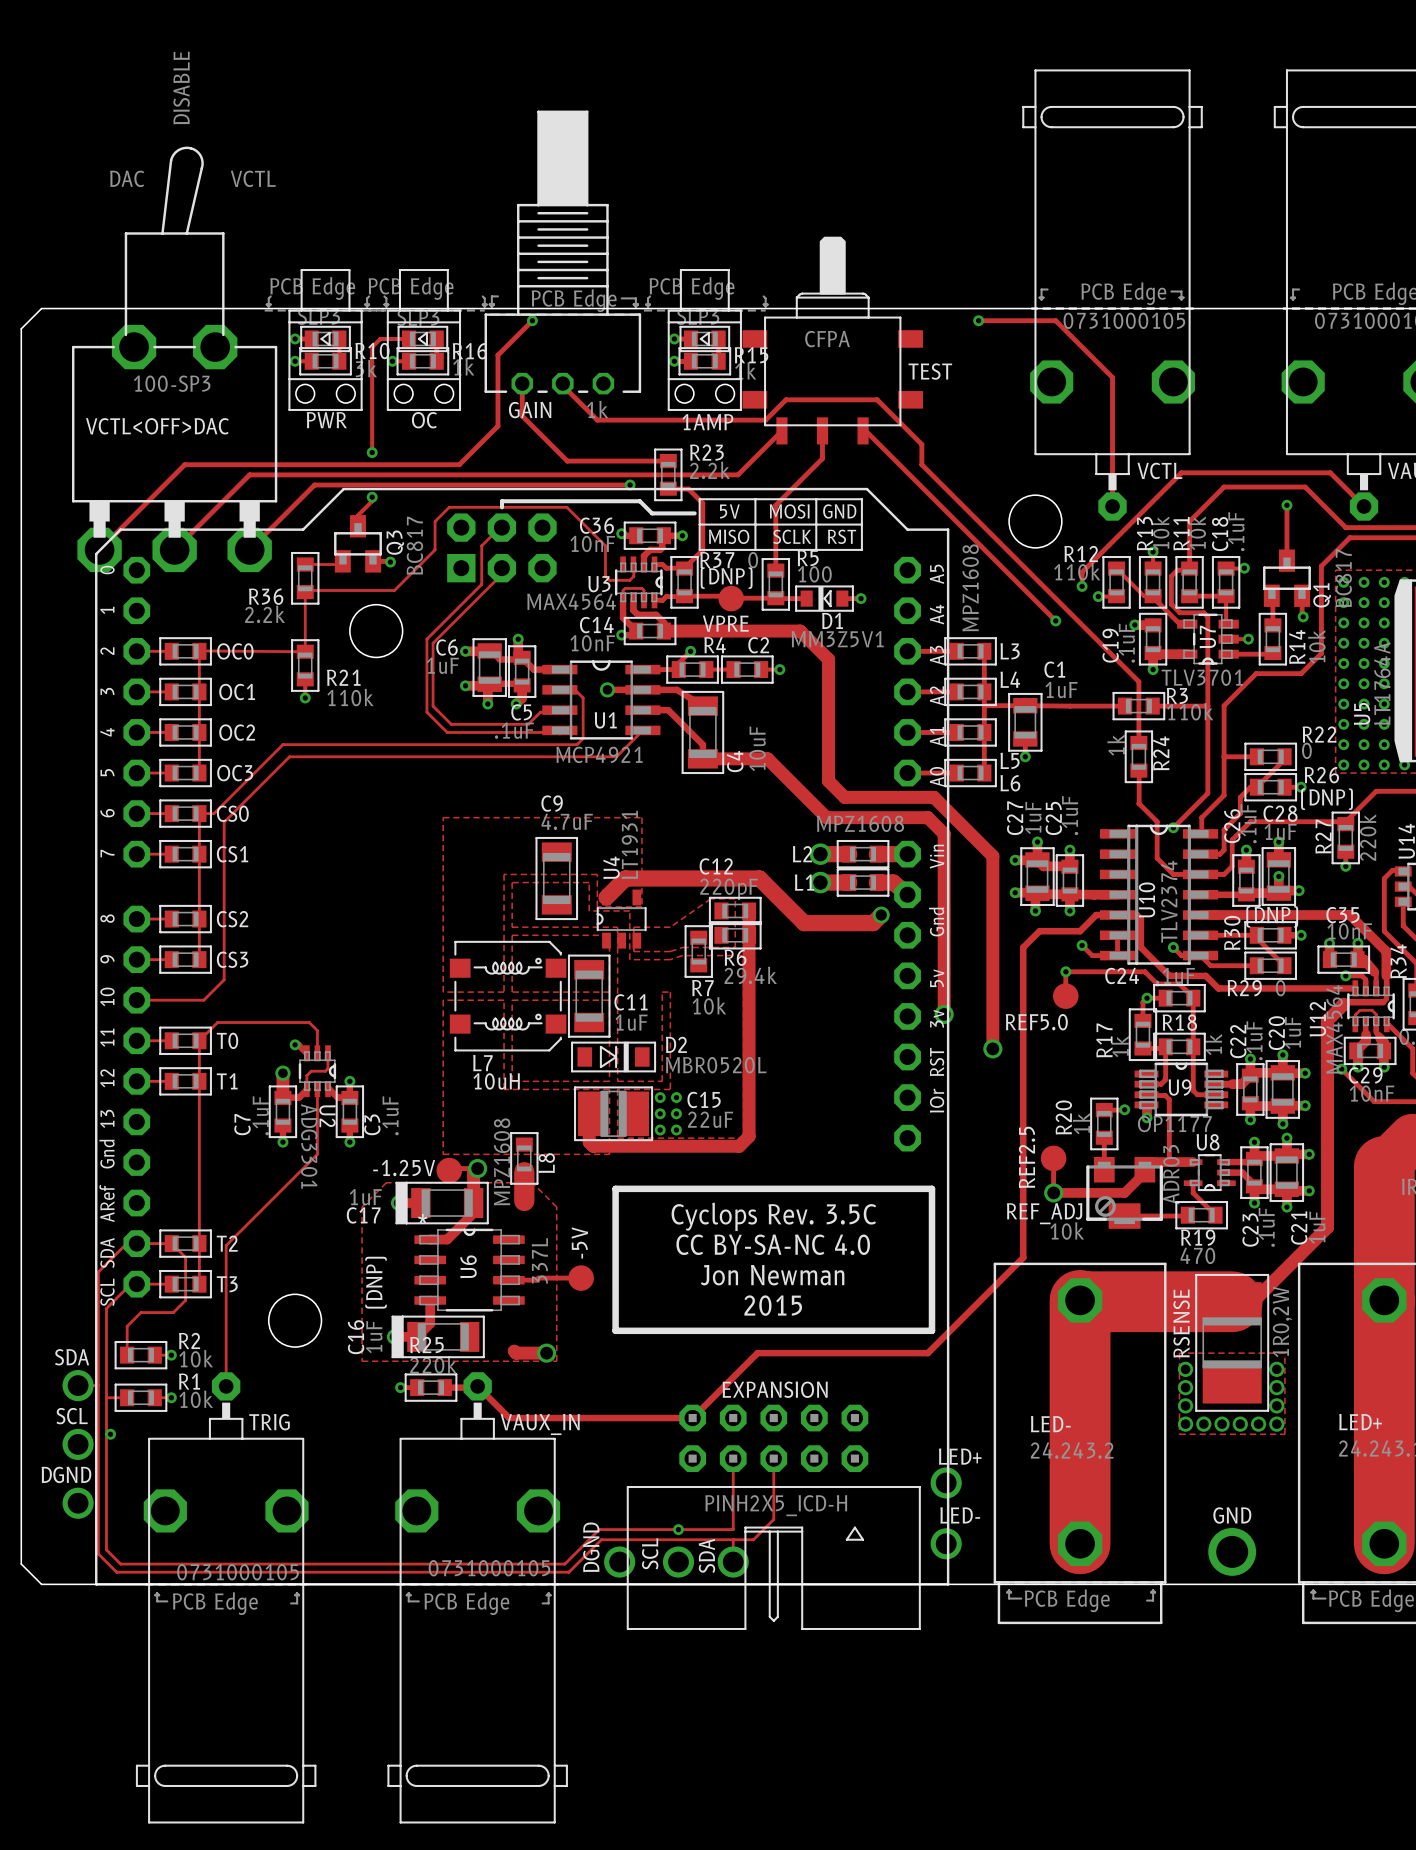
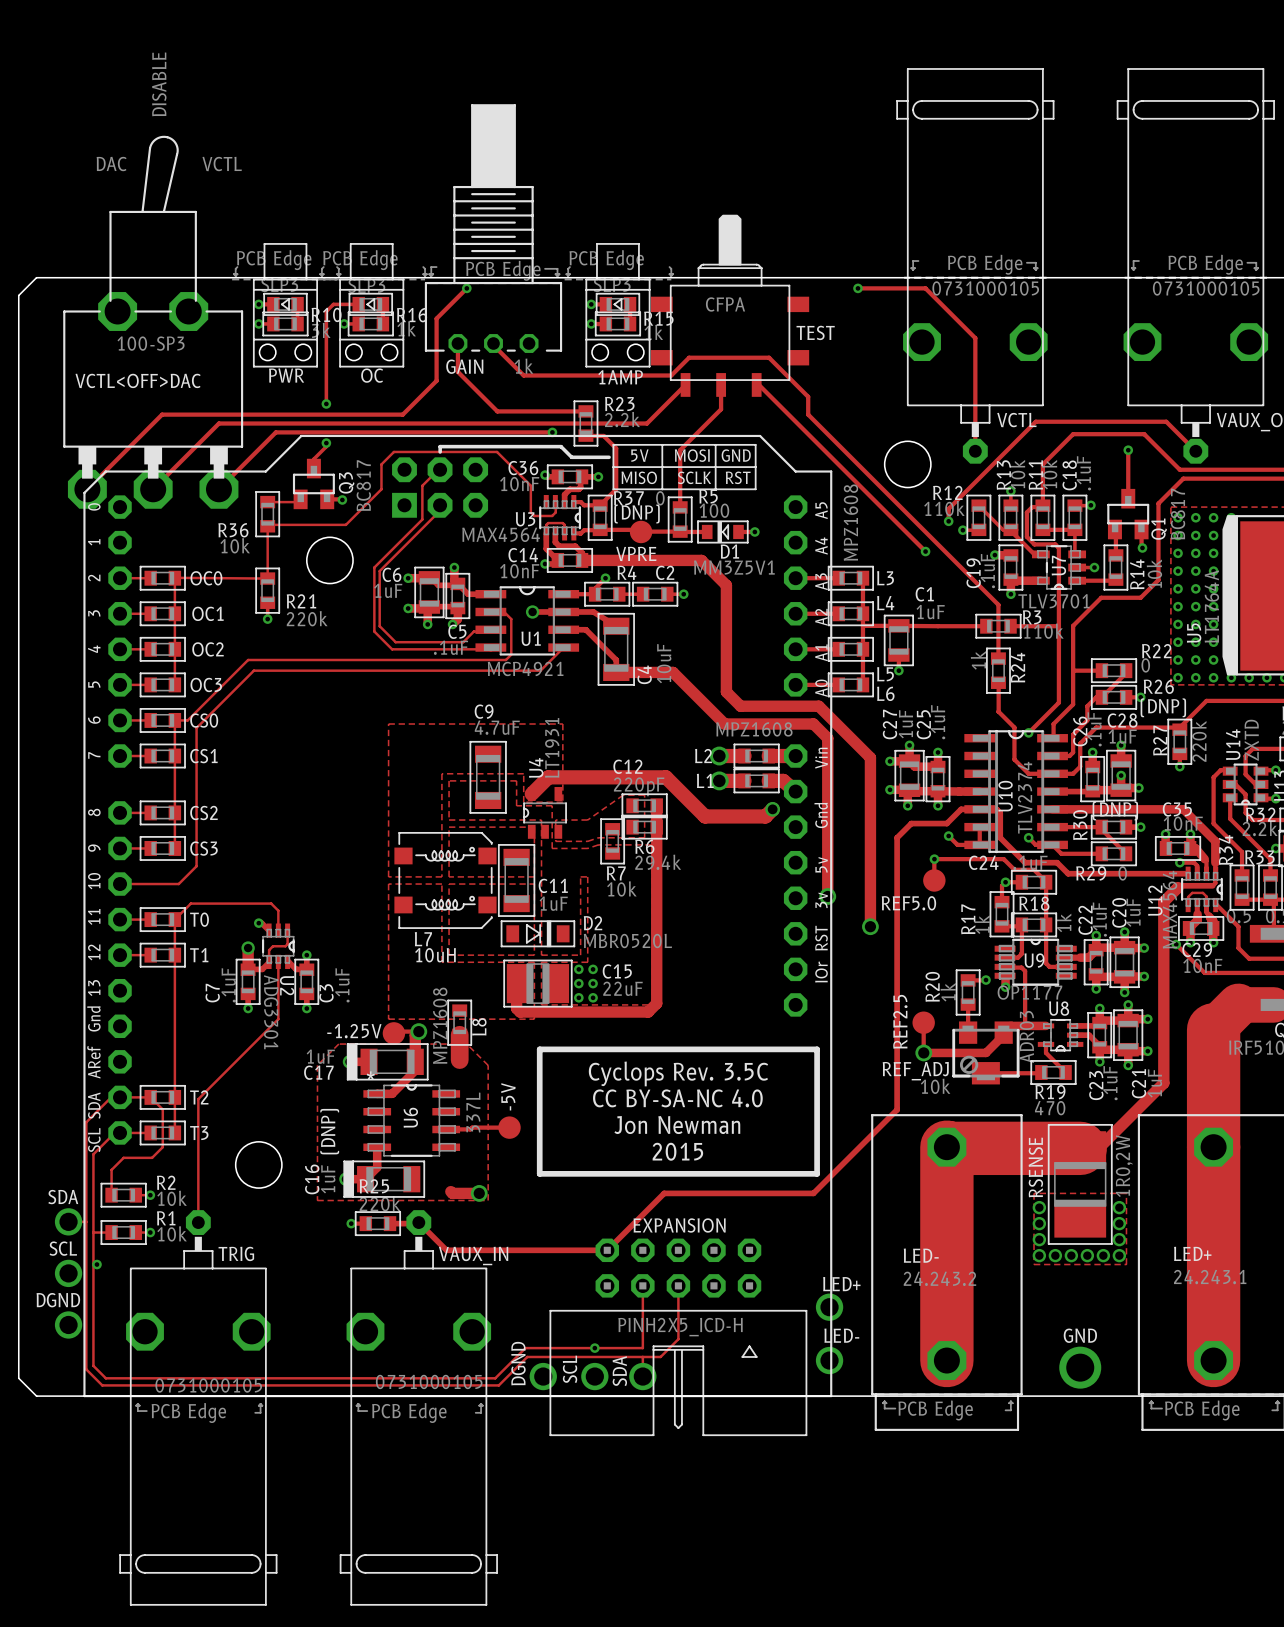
R36 value: 2.2k (265, 614) -> 10k (235, 545)
R21 value: 110k (350, 697) -> 220k (307, 618)

